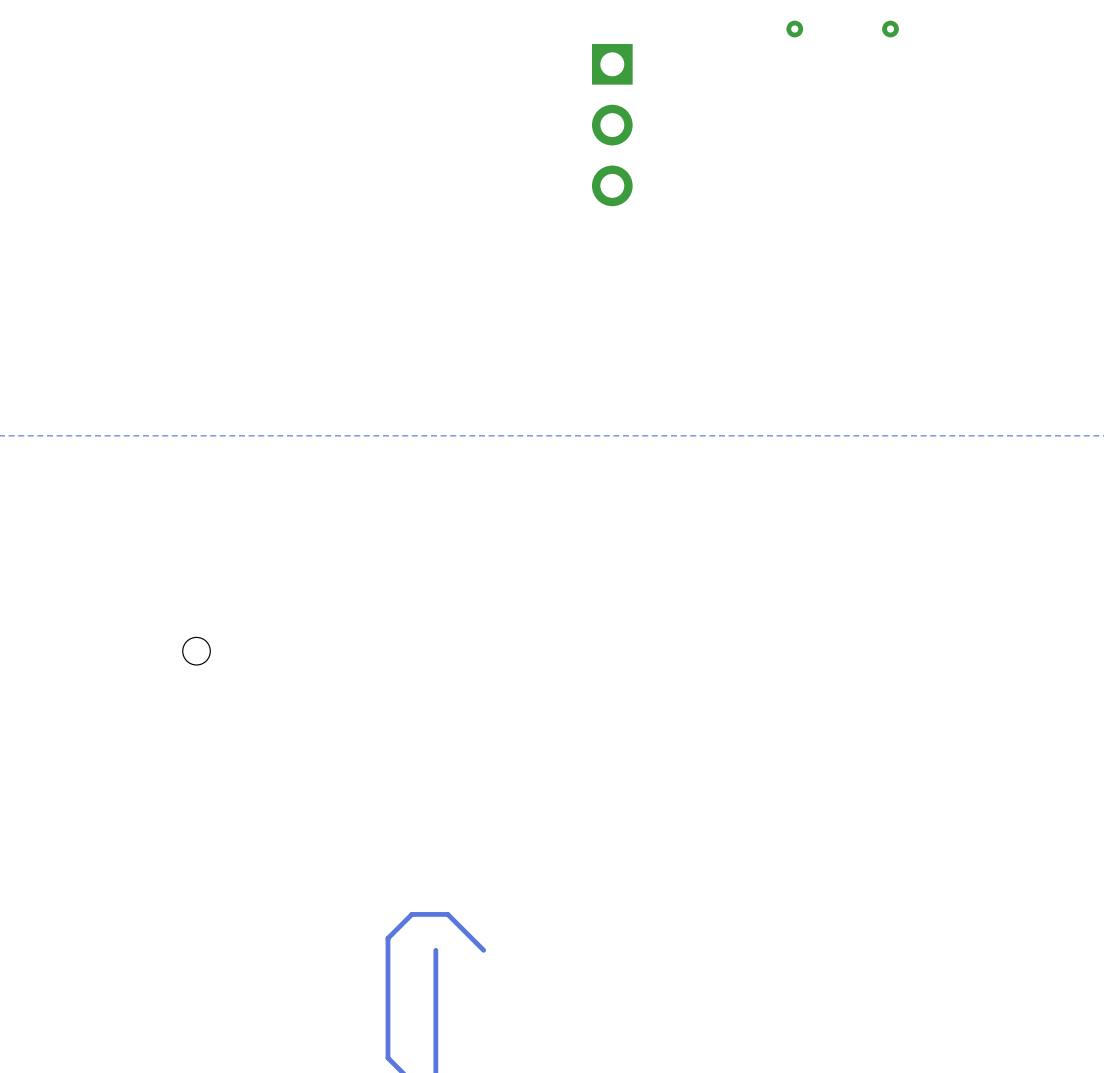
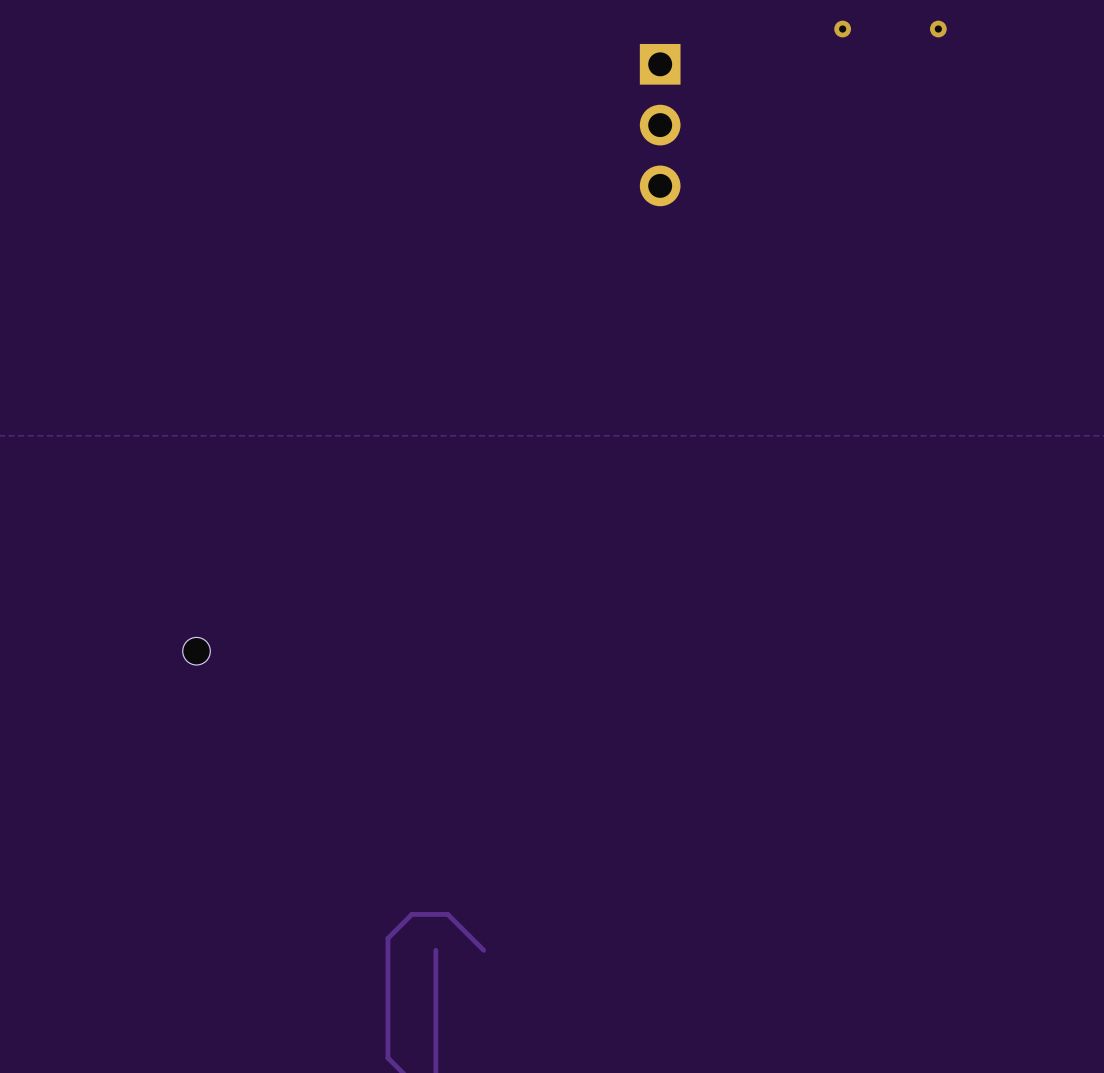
via: (794, 29) -> none
via: none -> (842, 29)
via: (890, 29) -> none
via: none -> (938, 29)
part position: (612, 125) -> (660, 125)

